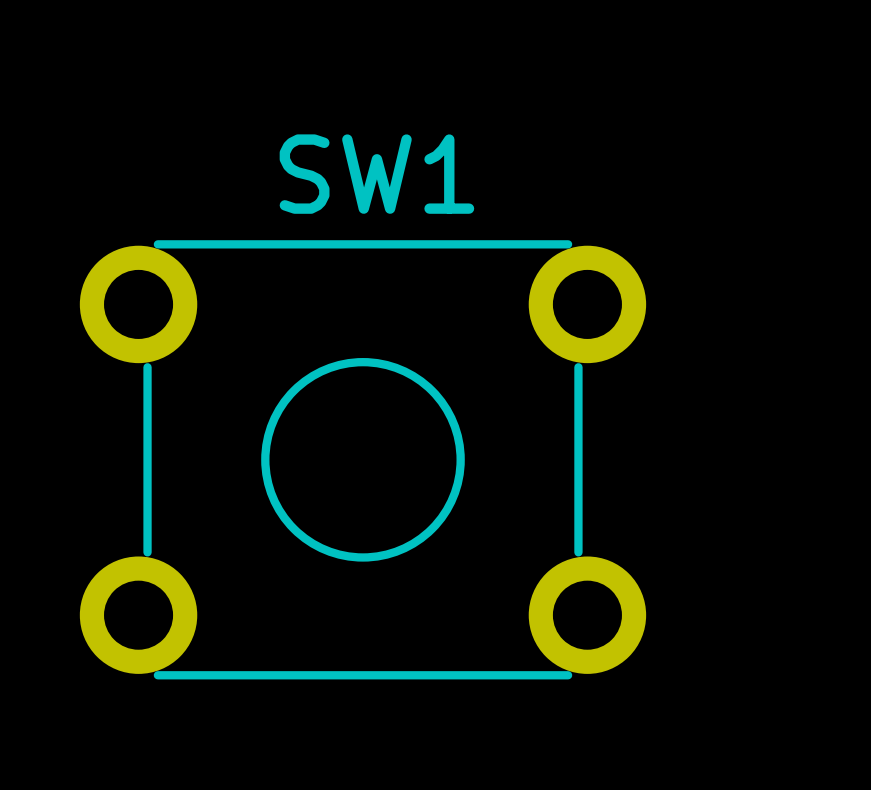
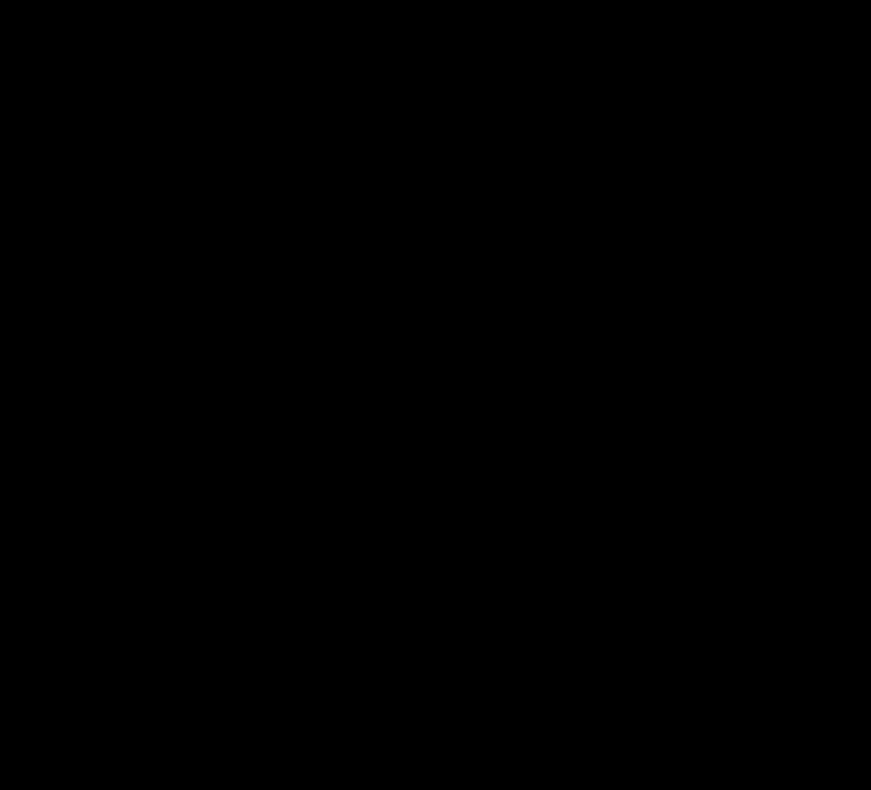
SW1: (362, 459) -> none

